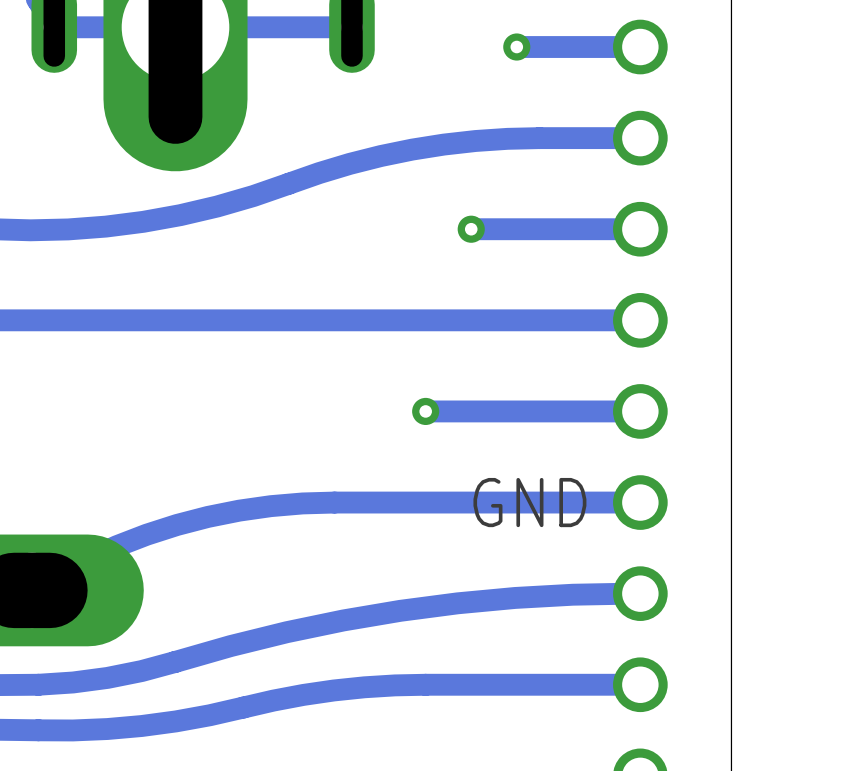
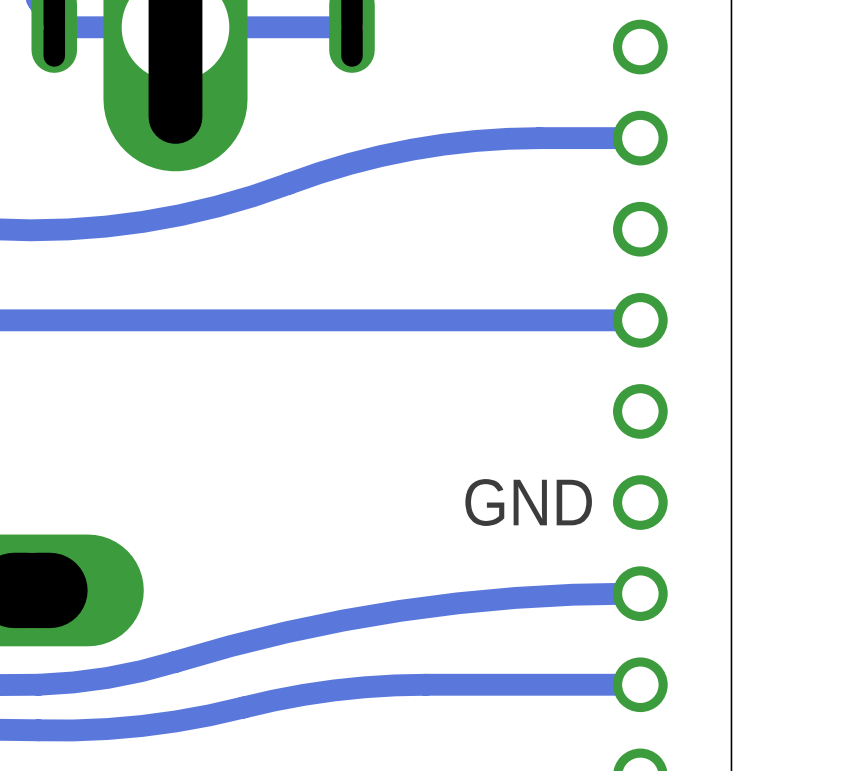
via: (516, 47) -> none
track: (640, 47) (516, 47) -> none
via: (471, 229) -> none
track: (640, 229) (471, 229) -> none
via: (425, 411) -> none
track: (640, 411) (425, 411) -> none
track: (640, 502) (334, 502) (302, 503) (239, 510) (177, 524) (116, 546) (87, 559) (32, 590) -> none

